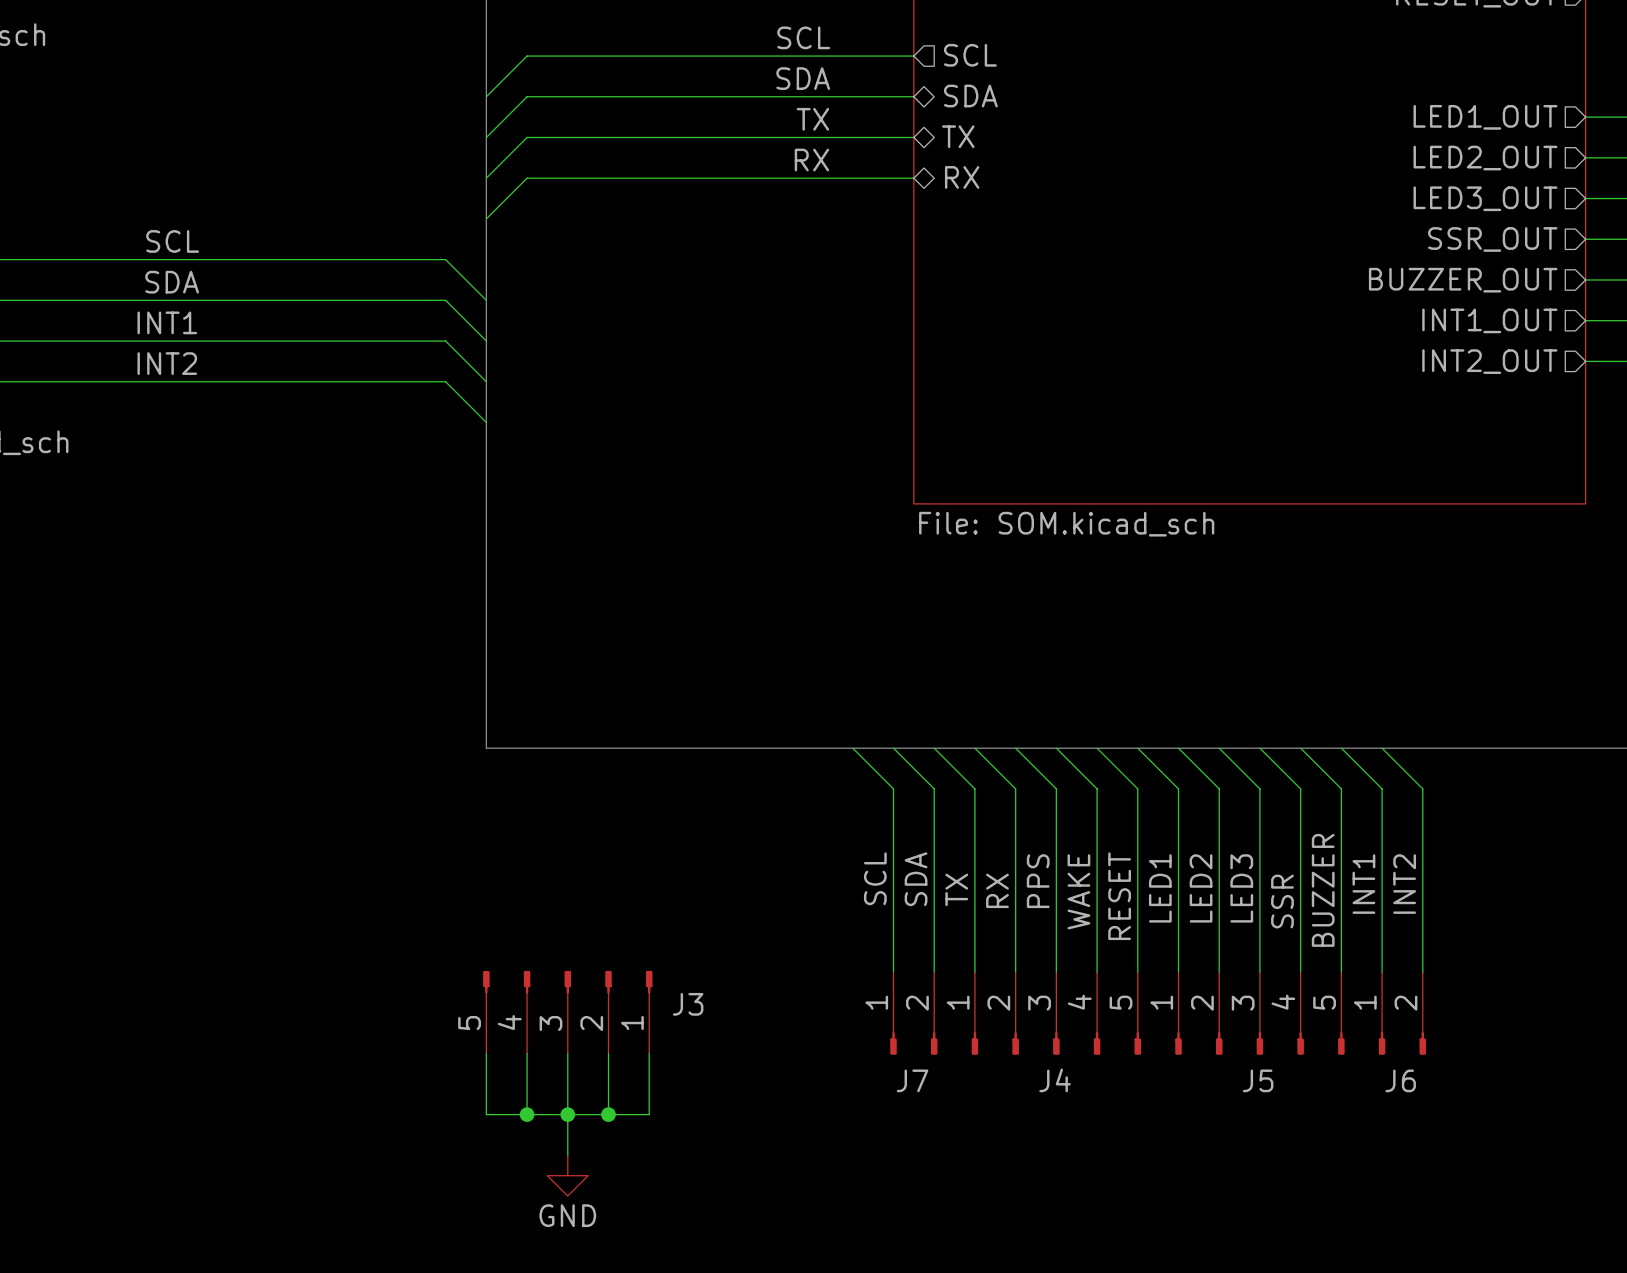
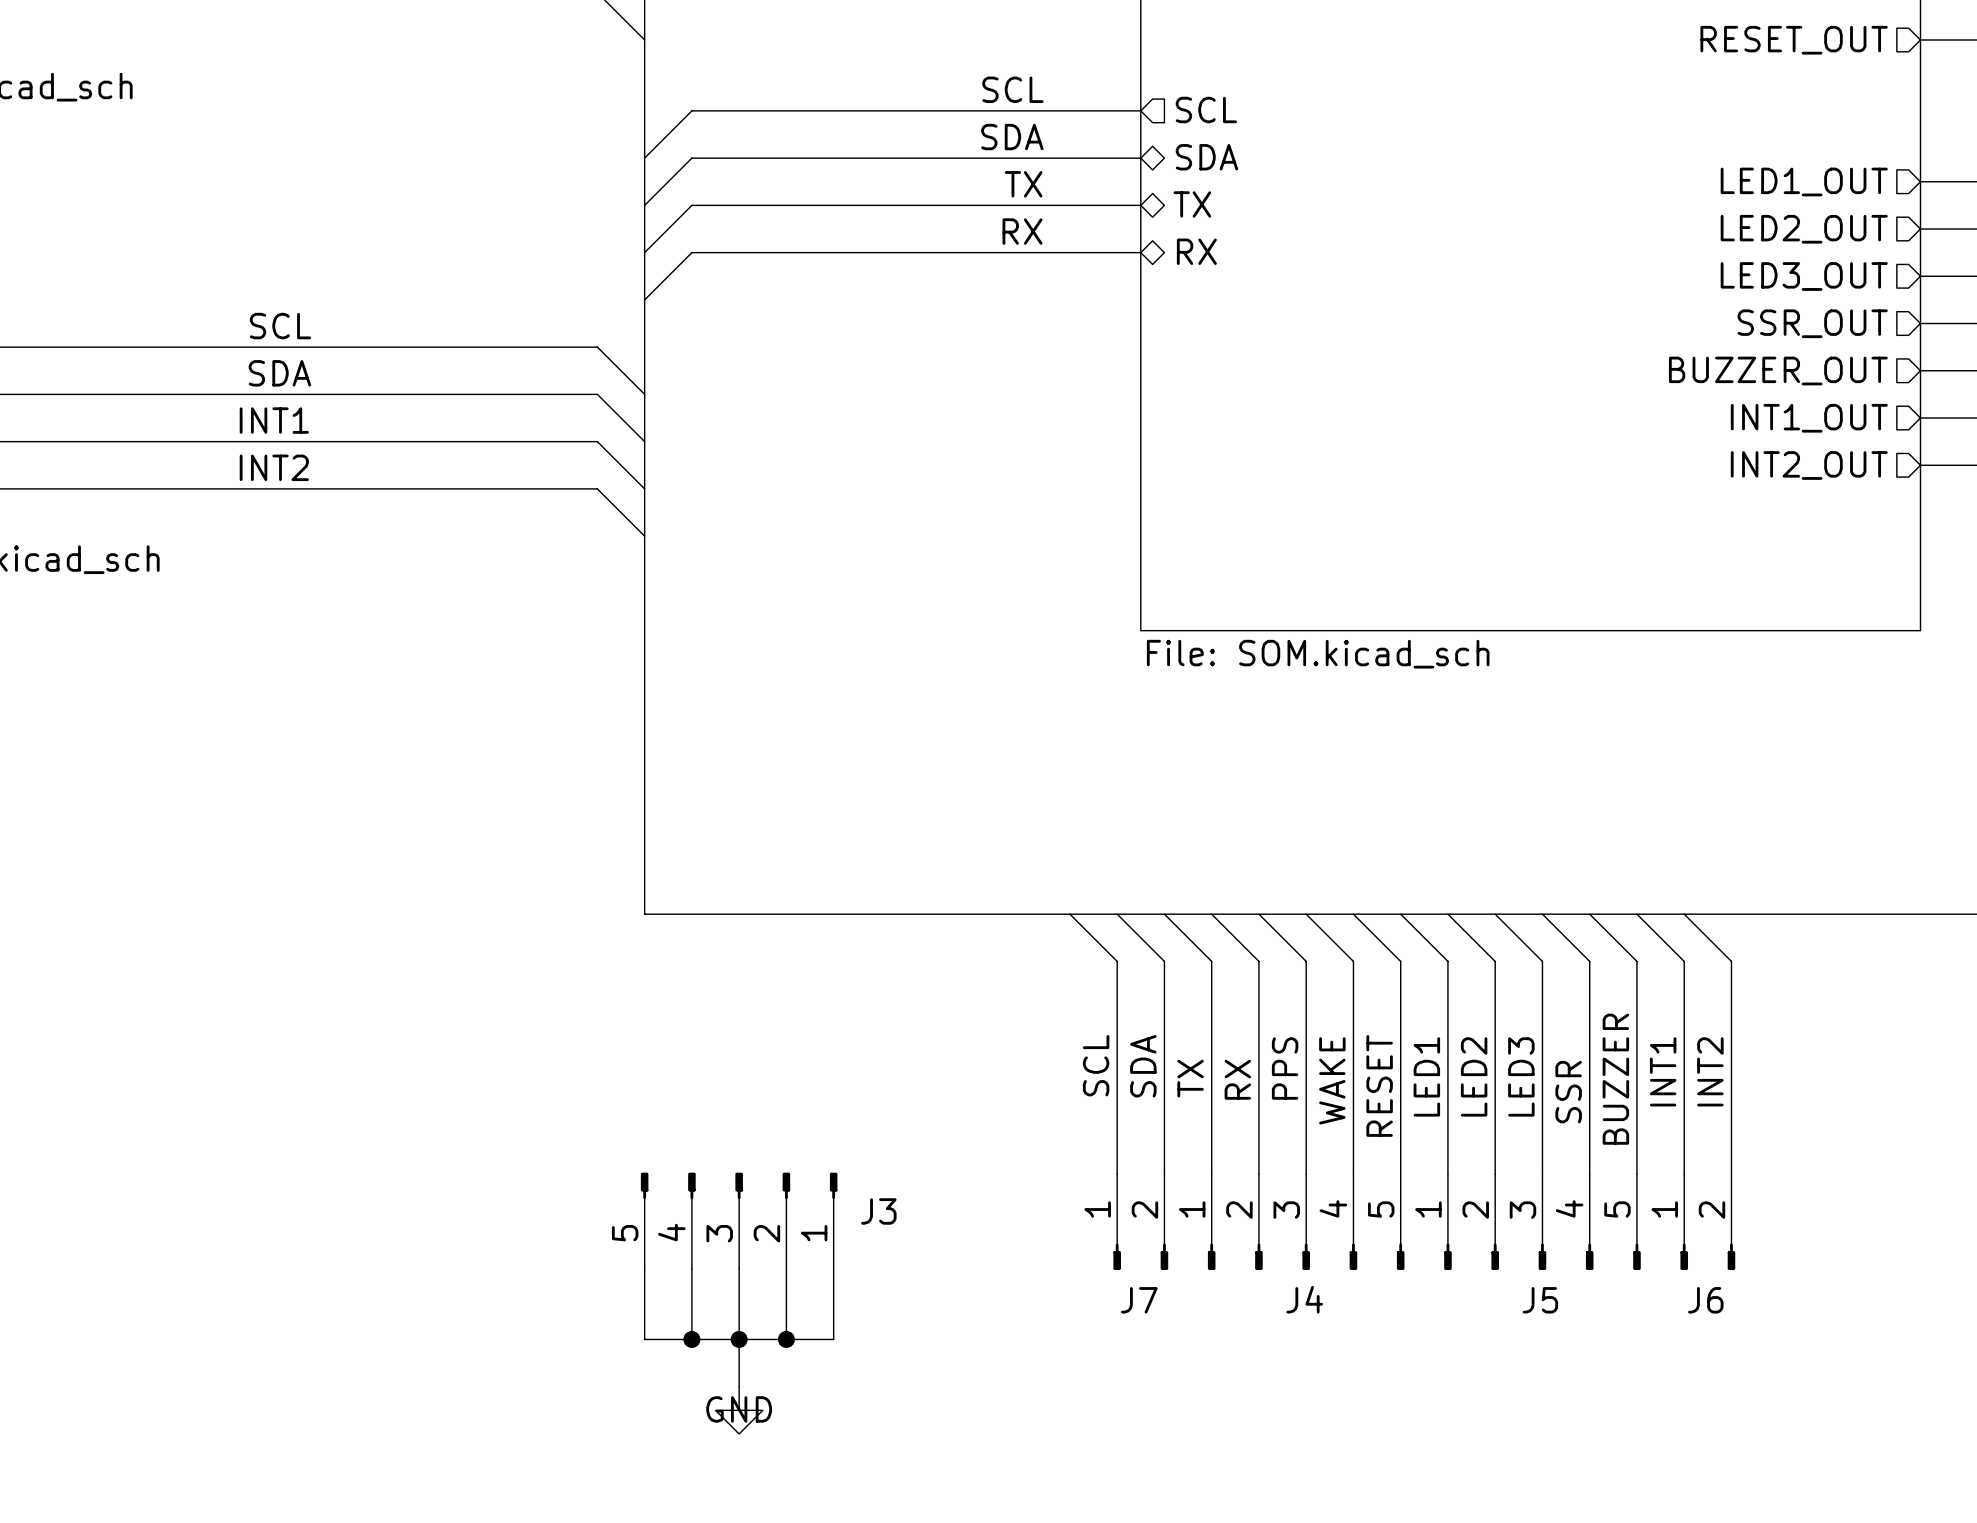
power symbol text position: GND (567, 1215) -> GND (739, 1409)

